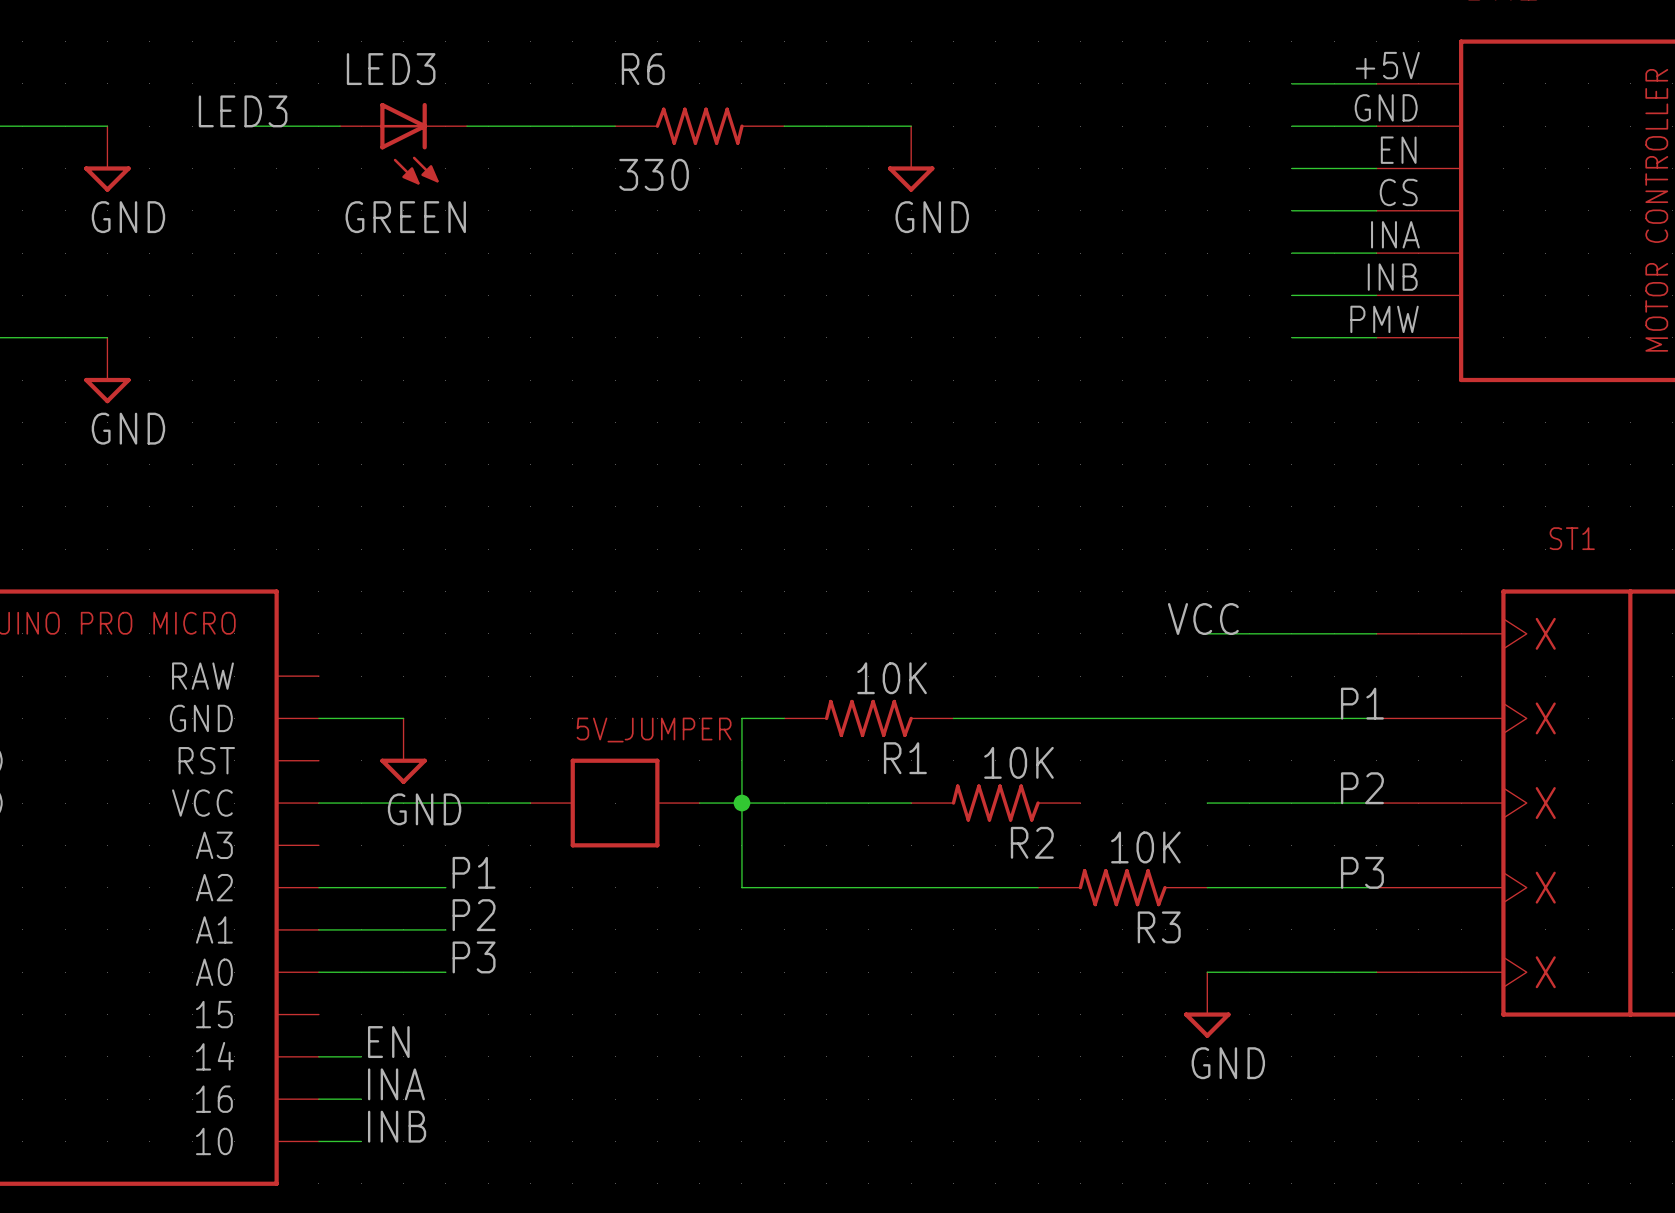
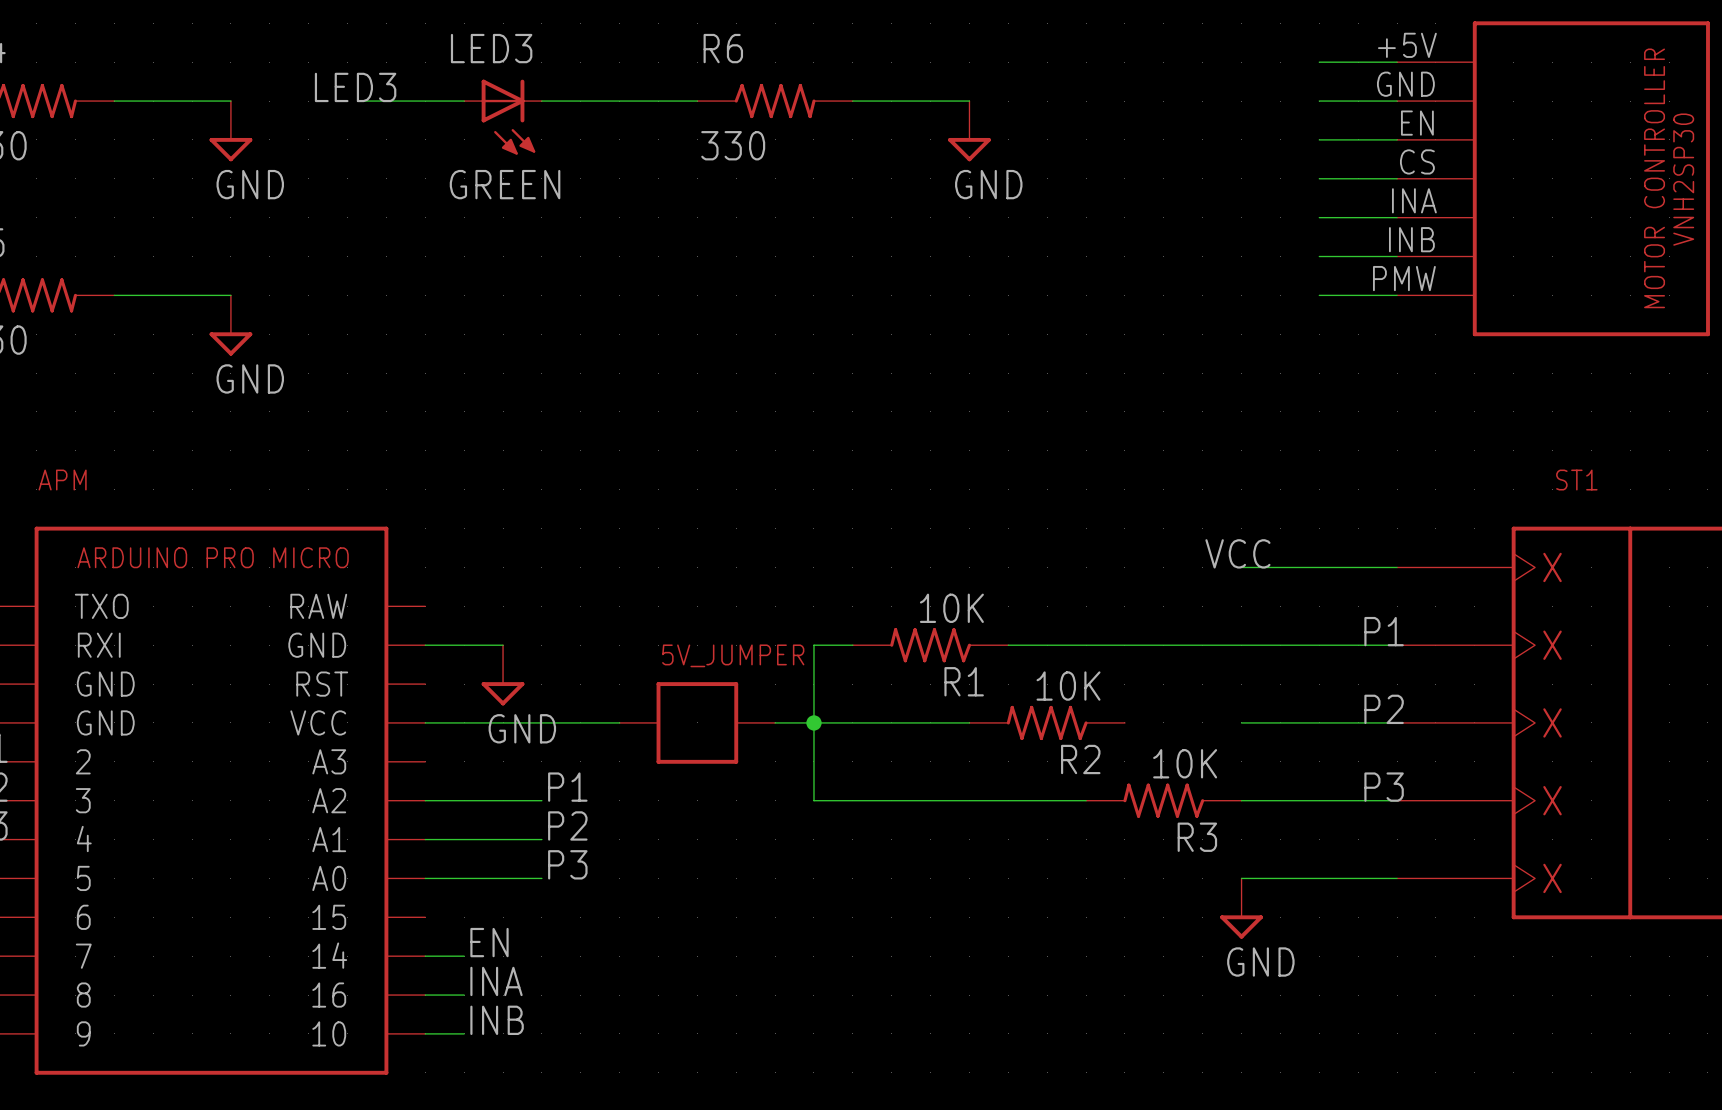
LED3 symbol: [340, 102, 468, 185] -> [464, 79, 542, 155]

